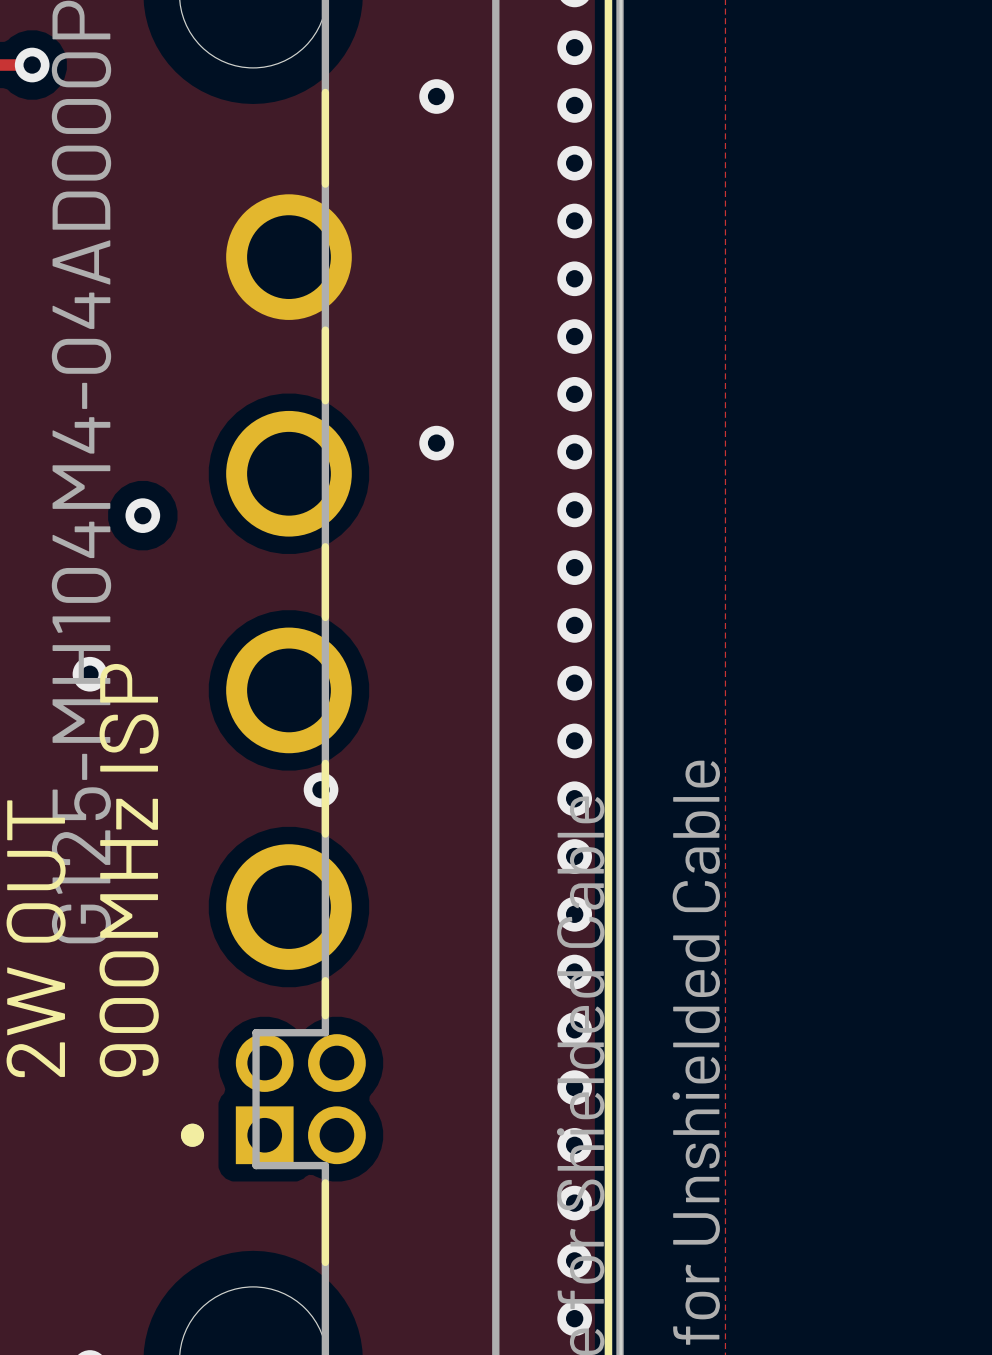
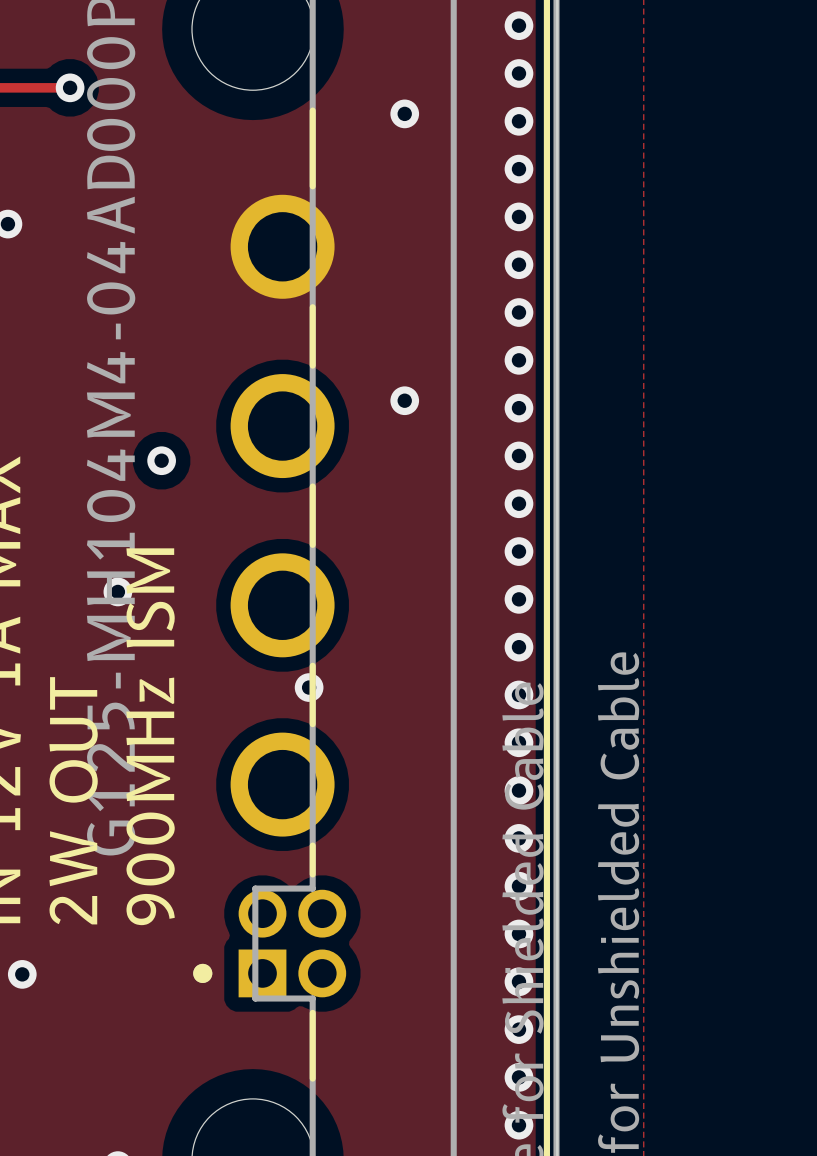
text: 900MHz ISP (129, 870) -> 900MHz ISM (150, 736)

